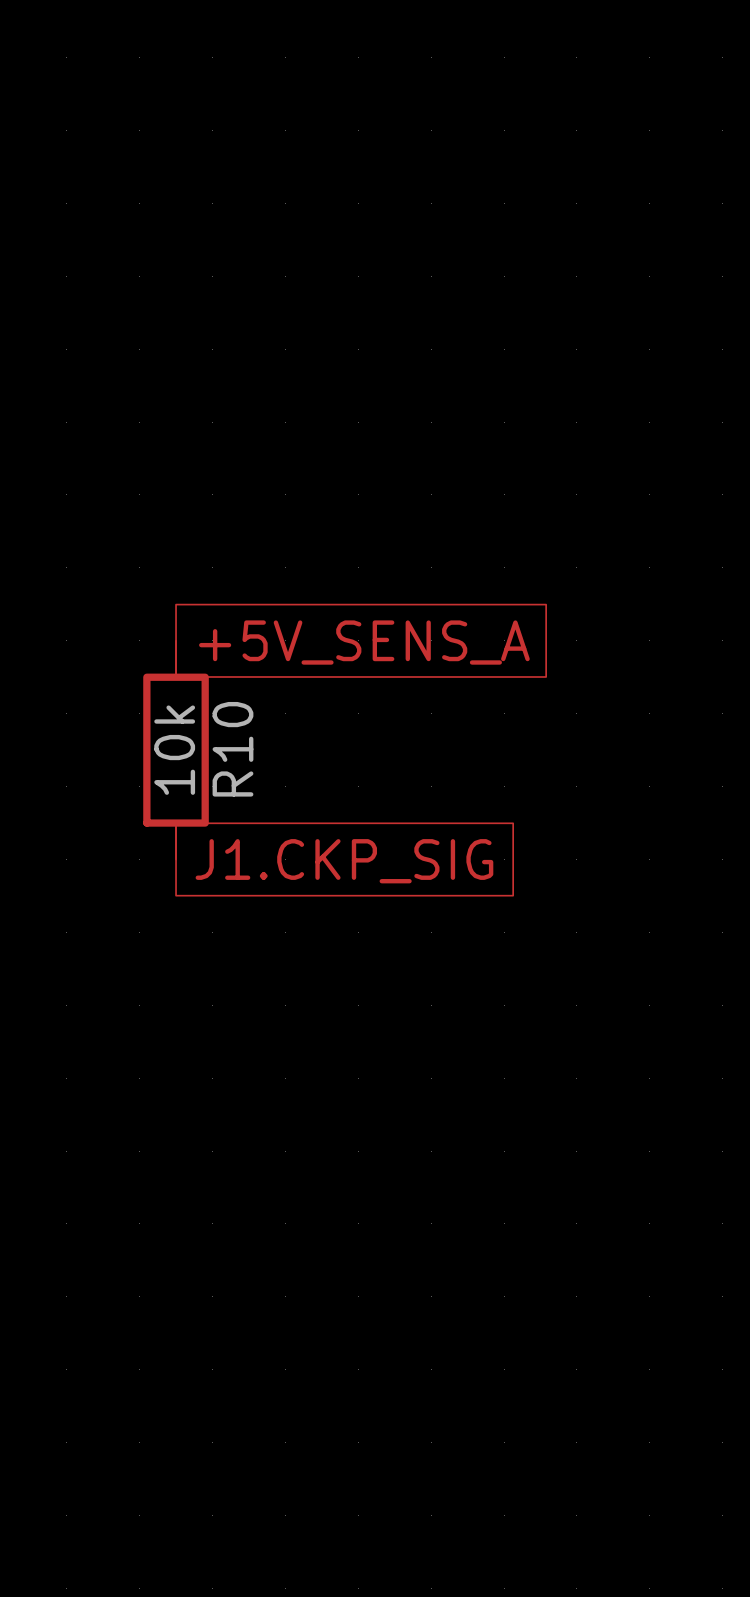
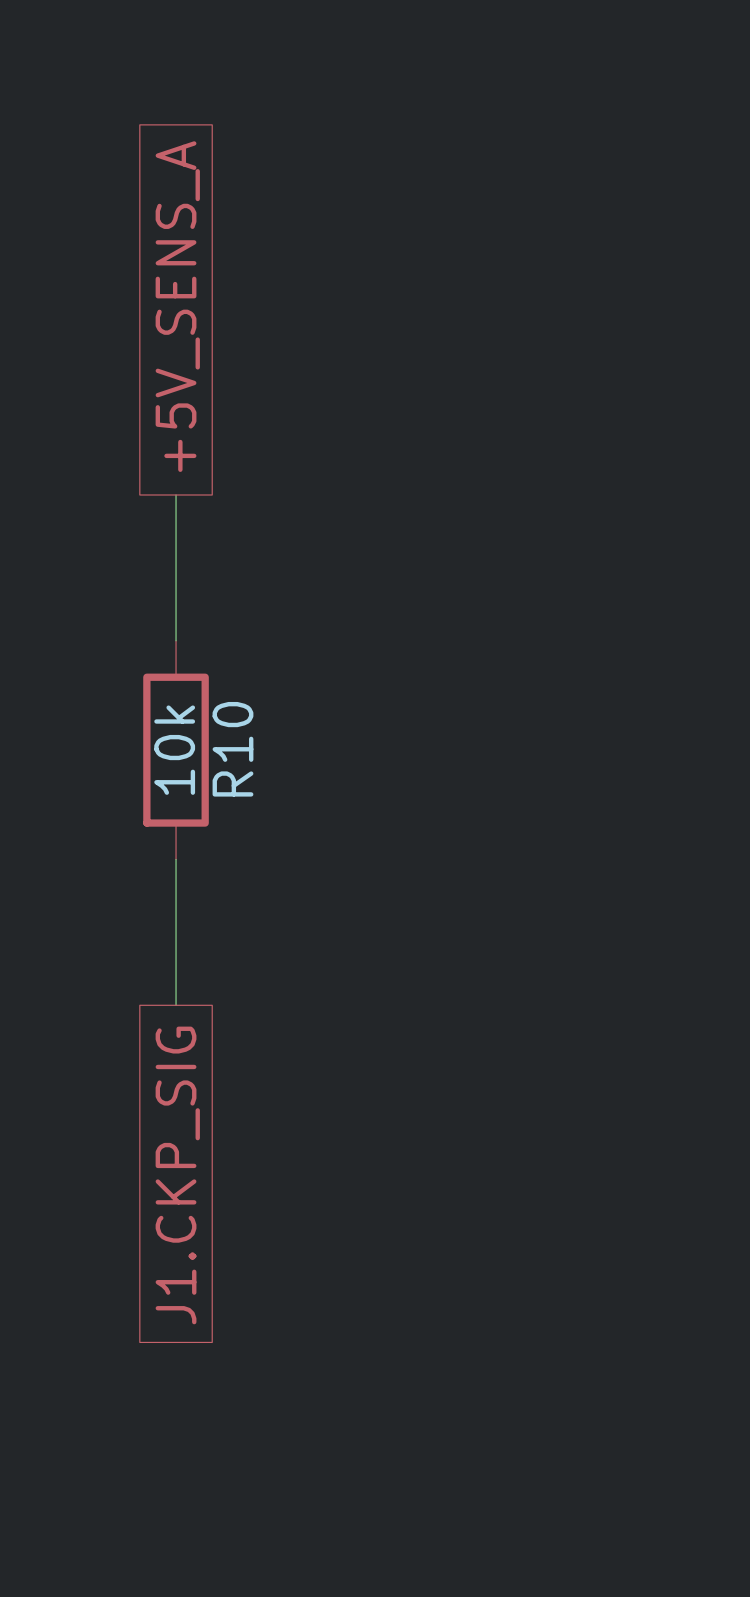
wire: none -> (176, 494) (176, 640)
global label rotation: 0° (364, 642) -> 90° counterclockwise (177, 306)
wire: none -> (176, 859) (176, 1005)
global label rotation: 0° (344, 861) -> 90° clockwise (177, 1175)

